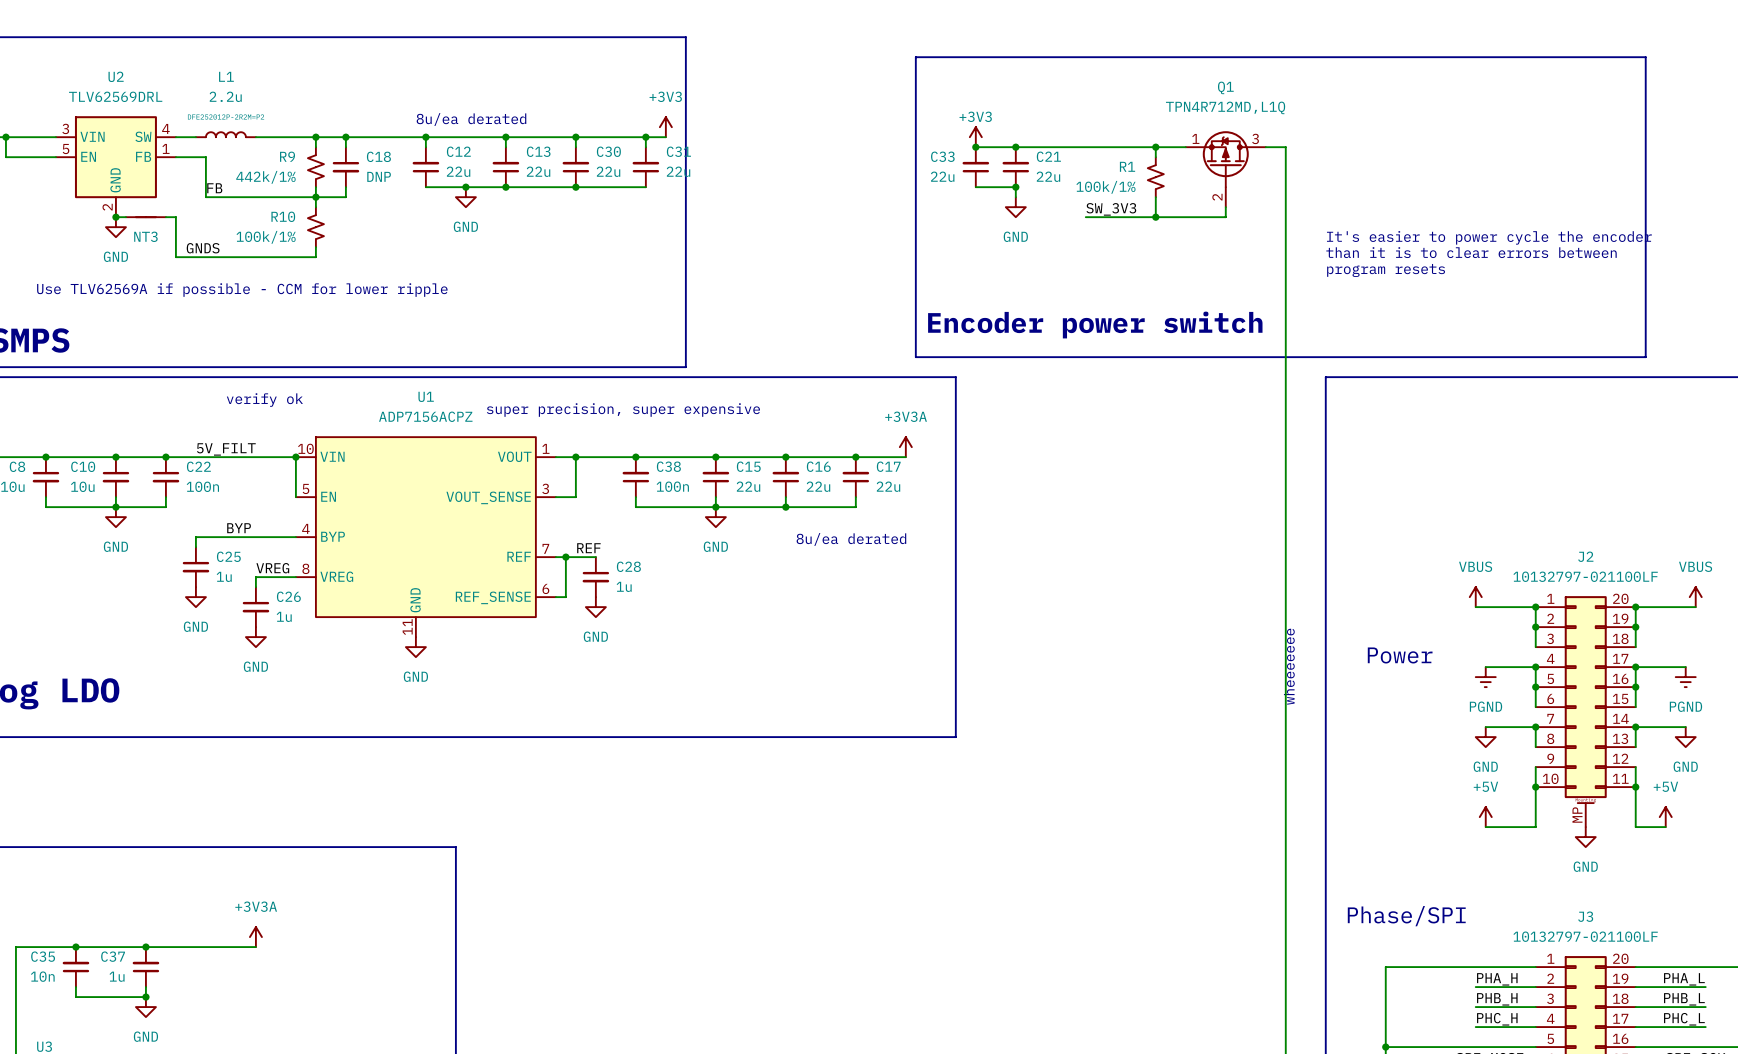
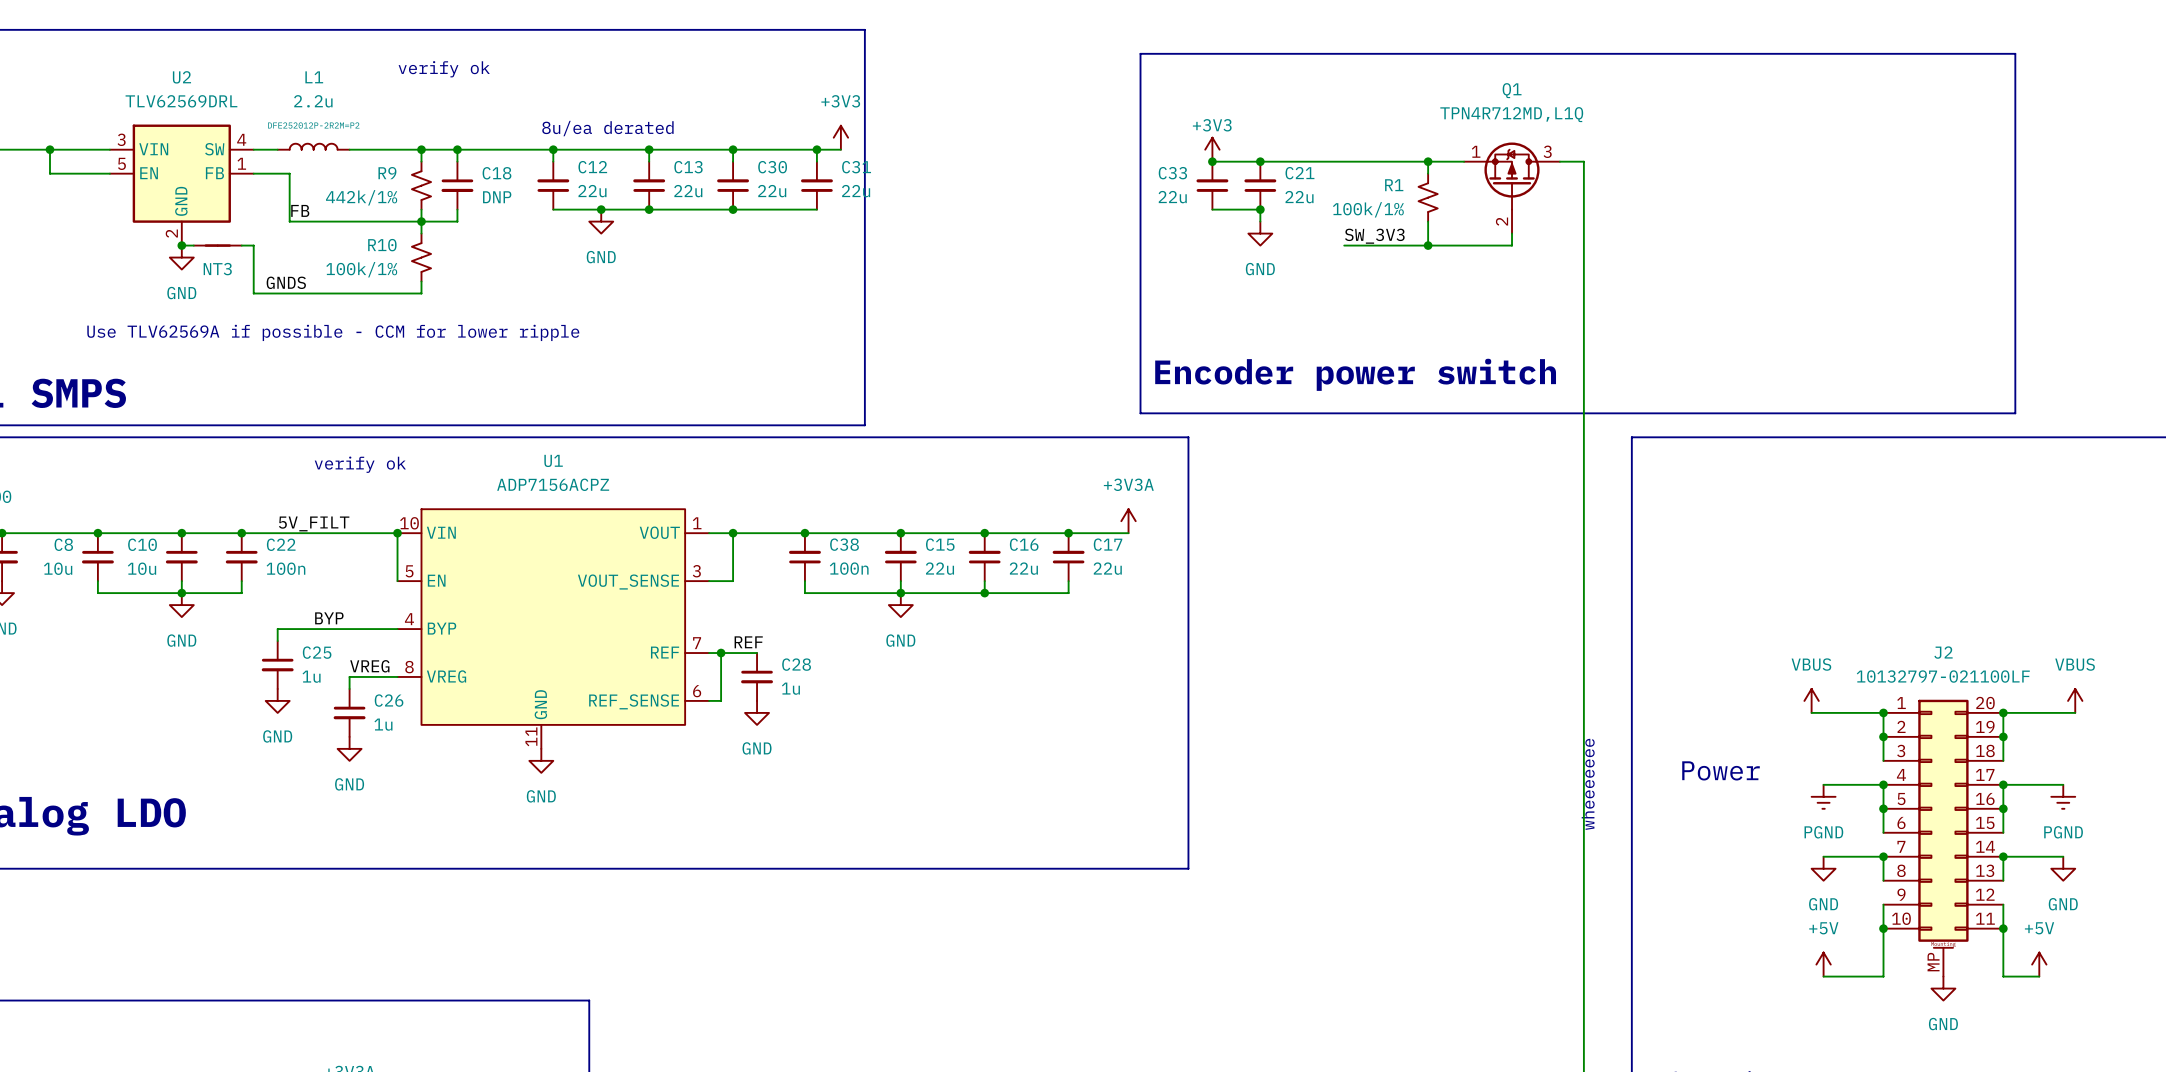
text: none -> verify ok (444, 69)
text: It's easier to power cycle the encoder (1489, 237) -> none
text: than it is to clear errors between (1471, 252) -> none
text: program resets (1386, 270) -> none
text: super precision, super expensive (623, 410) -> none
text: 8u/ea derated (851, 539) -> none

